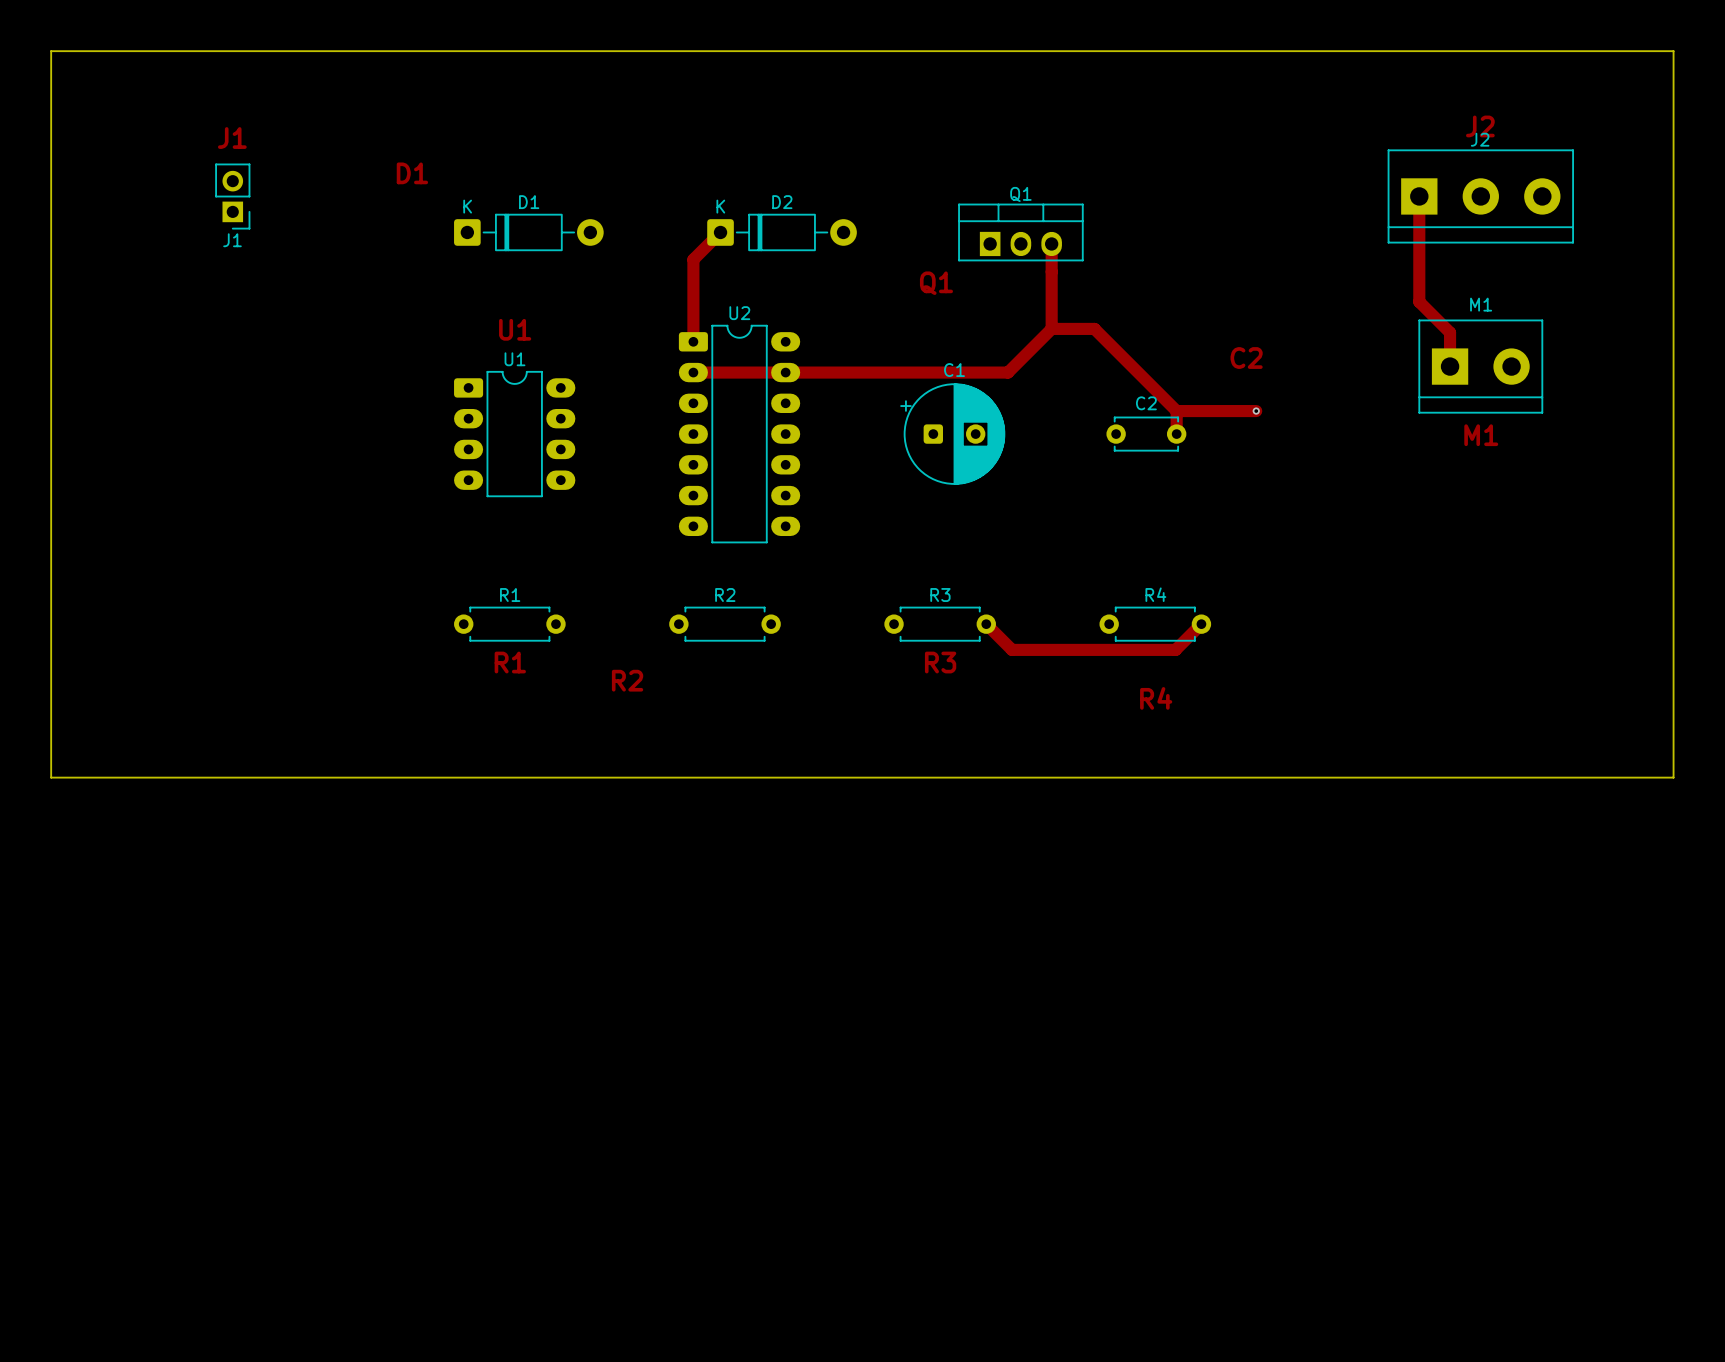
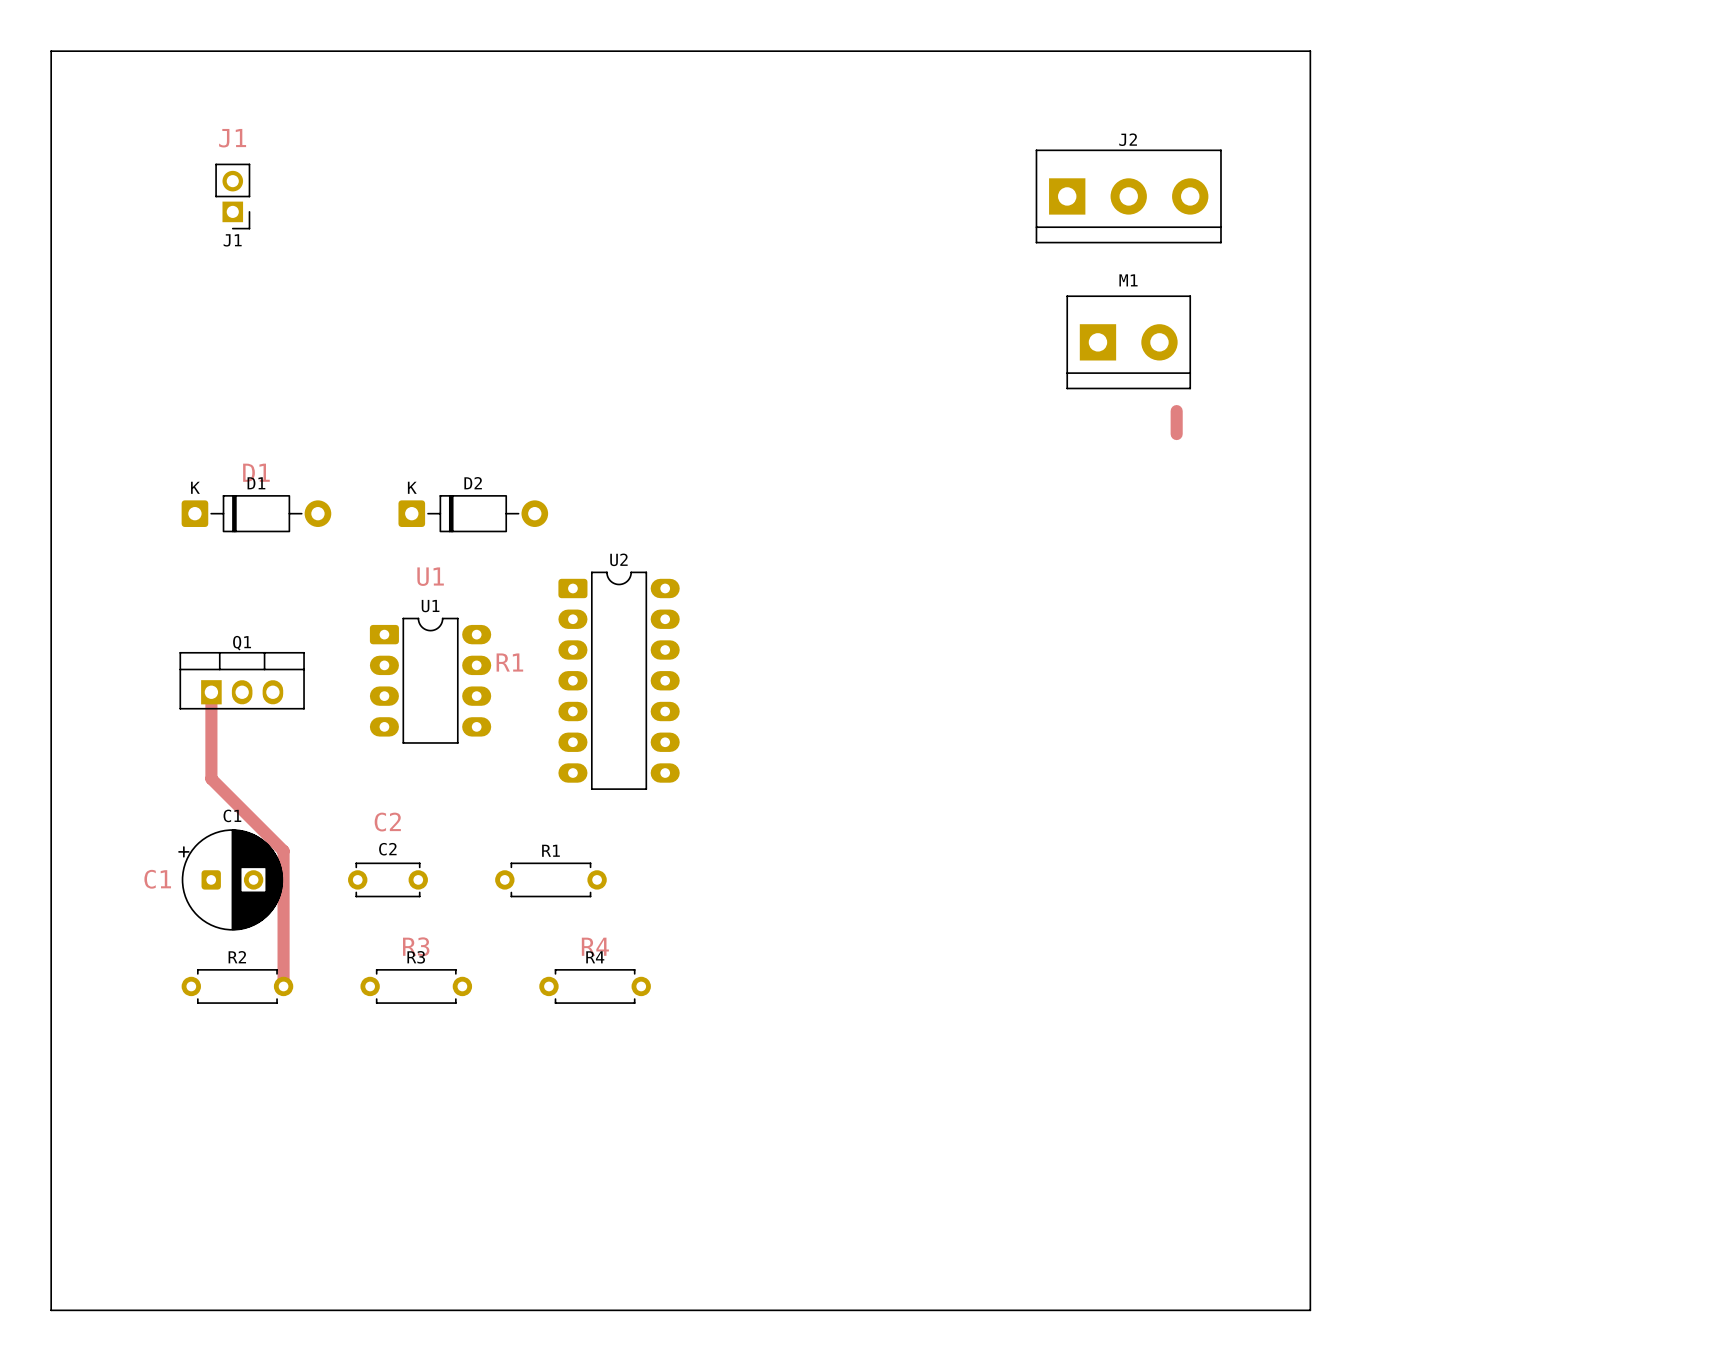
board edge: (1310, 51) (1673, 51) (1673, 777) (51, 777) -> (1310, 51) (1310, 1310) (51, 1310) (51, 777)
text: J2 (1480, 126) -> none
text: D1 (412, 173) -> none
track: (1419, 196) (1419, 301) (1450, 332) (1450, 366) -> none
J2 position: (1480, 196) -> (1128, 196)
D1 position: (528, 232) -> (256, 513)
track: (720, 232) (693, 259) (693, 341) -> none
D2 position: (782, 232) -> (473, 513)
Q1 position: (1020, 232) -> (242, 680)
track: (1051, 243) (1051, 328) -> none
text: Q1 (936, 283) -> none
track: (1051, 328) (1094, 328) (1176, 411) (1256, 411) -> none
track: (1051, 328) (1008, 372) (693, 372) -> none
text position: U1 (515, 329) -> U1 (430, 576)
text: C2 (1246, 358) -> none
M1 position: (1480, 366) -> (1128, 342)
via: (1256, 411) -> none
U1 position: (514, 434) -> (430, 680)
U2 position: (739, 434) -> (619, 680)
C1 position: (952, 434) -> (230, 879)
C2 position: (1146, 434) -> (387, 879)
text: M1 (1481, 435) -> none
text: none -> D1 (256, 472)
R1 position: (509, 624) -> (550, 879)
R2 position: (725, 624) -> (237, 986)
R3 position: (940, 624) -> (416, 986)
track: (986, 624) (1012, 649) (1175, 649) (1201, 624) -> none
R4 position: (1155, 624) -> (595, 986)
text: R3 (940, 662) -> none
text: R2 (627, 680) -> none
track: none -> (211, 692) (211, 778) (283, 851) (283, 986)
text: R4 (1156, 698) -> none
text: none -> C2 (387, 822)
text: none -> C1 (157, 879)
text: none -> R3 (416, 946)
text: none -> R4 (595, 946)

